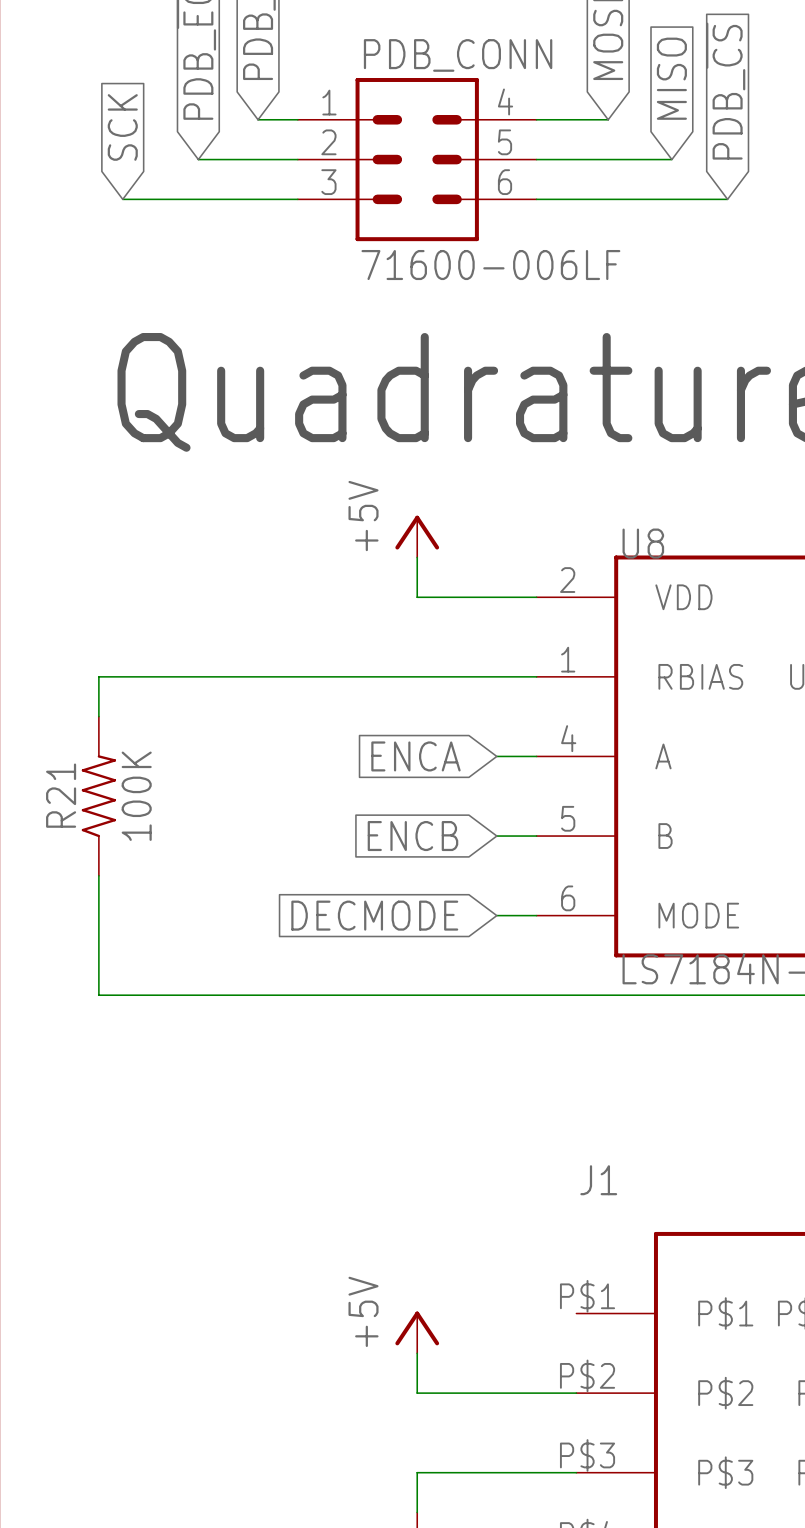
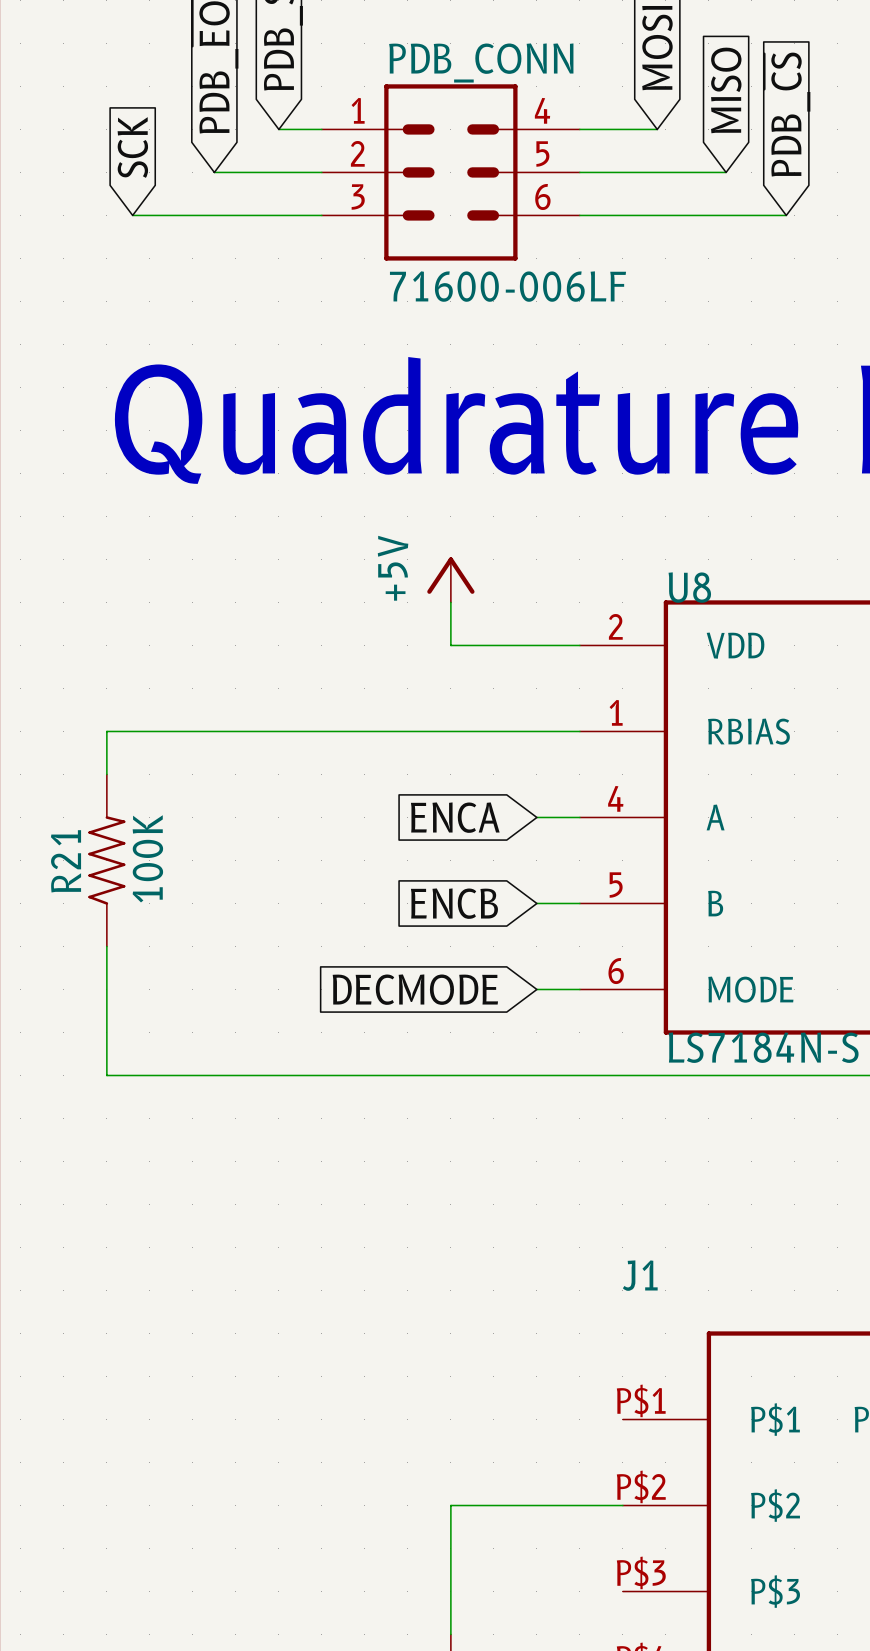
power symbol: +5V (417, 1332) -> none
wire: (417, 1353) (417, 1393) -> (450, 1591) (450, 1505)
wire: (417, 1472) (576, 1472) -> none

